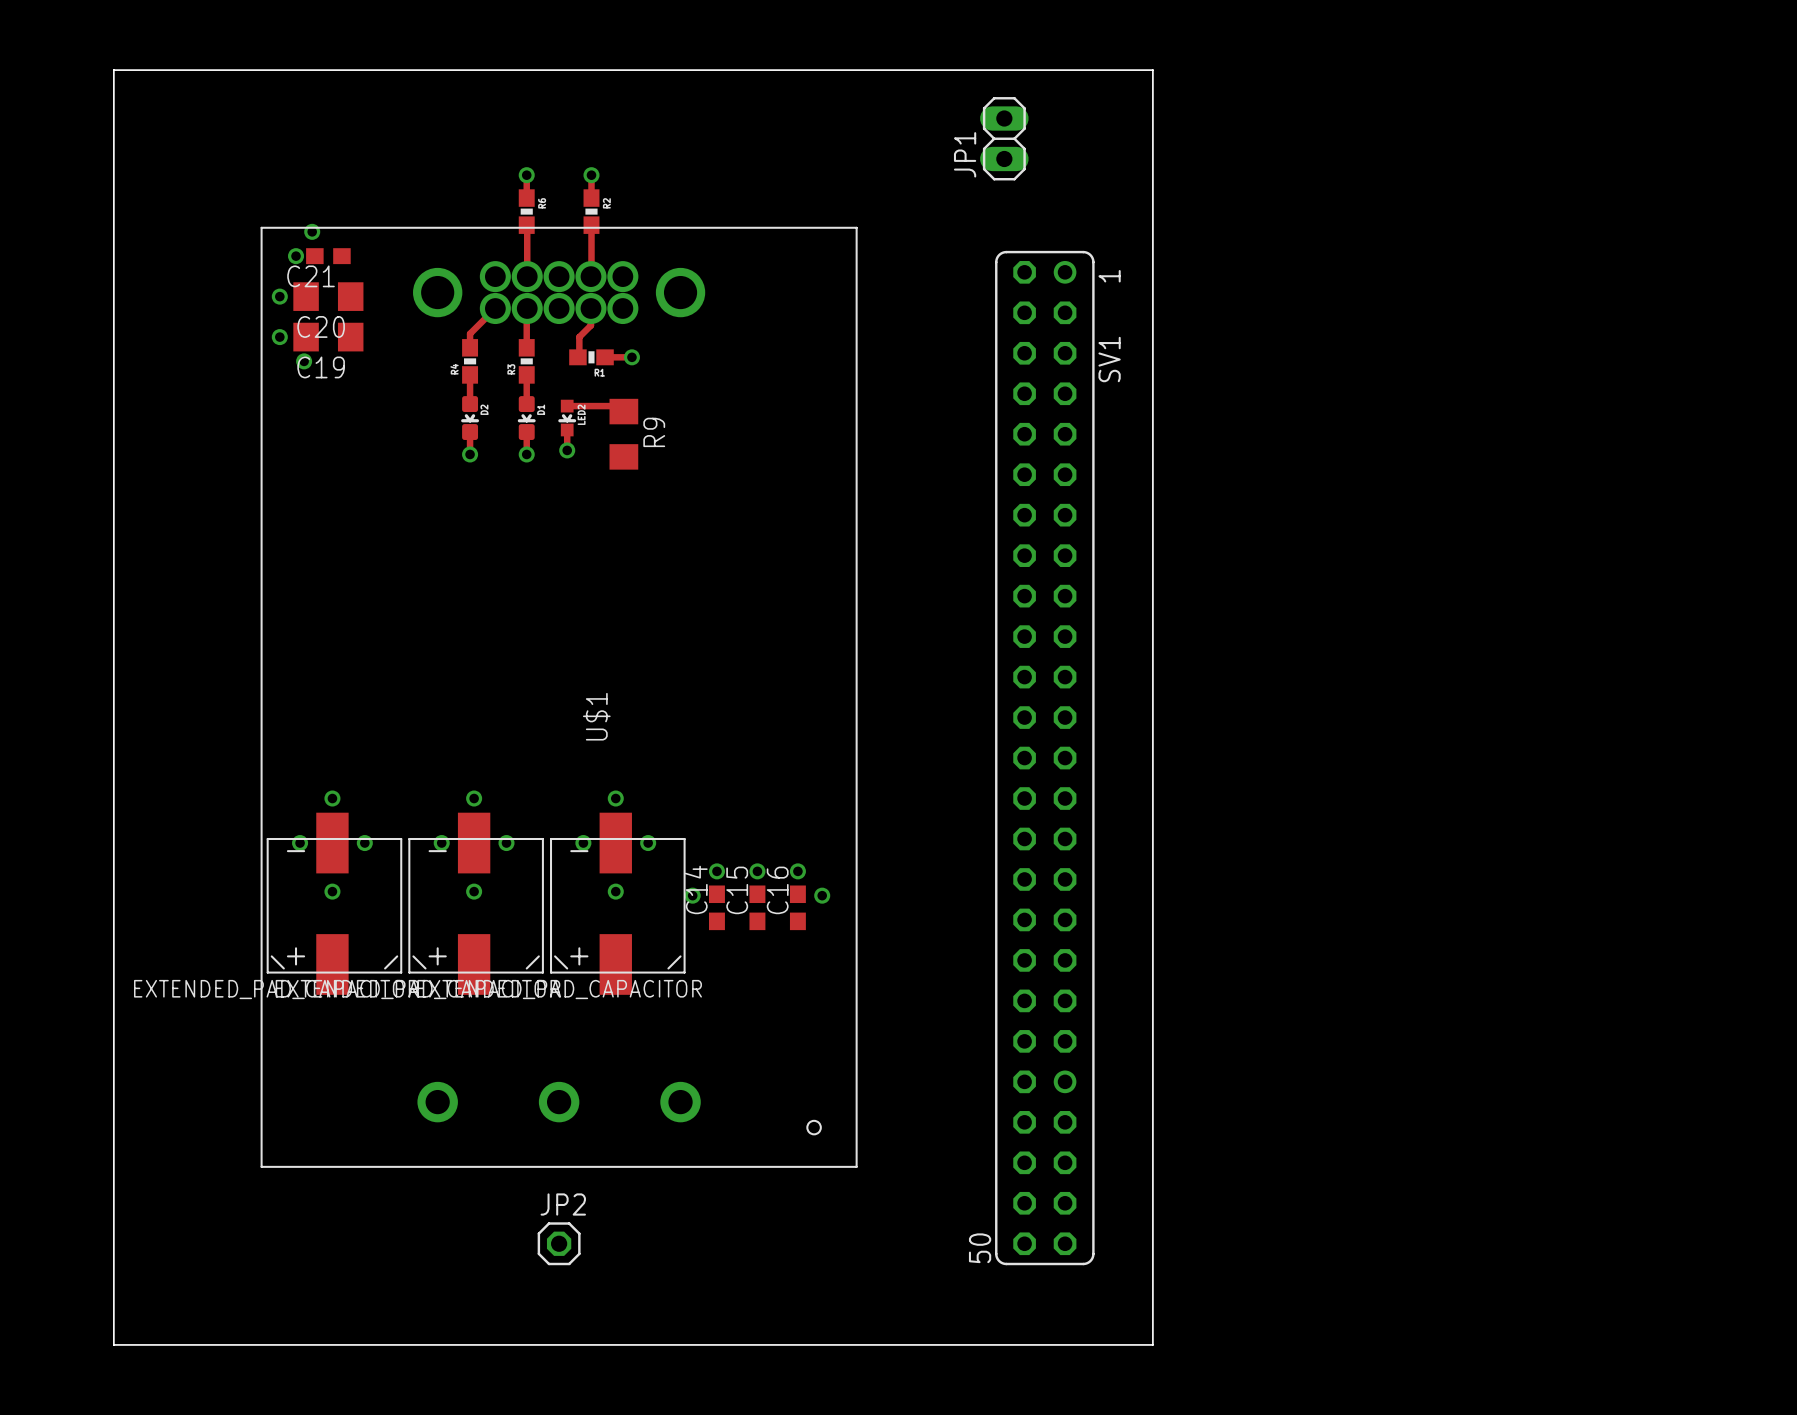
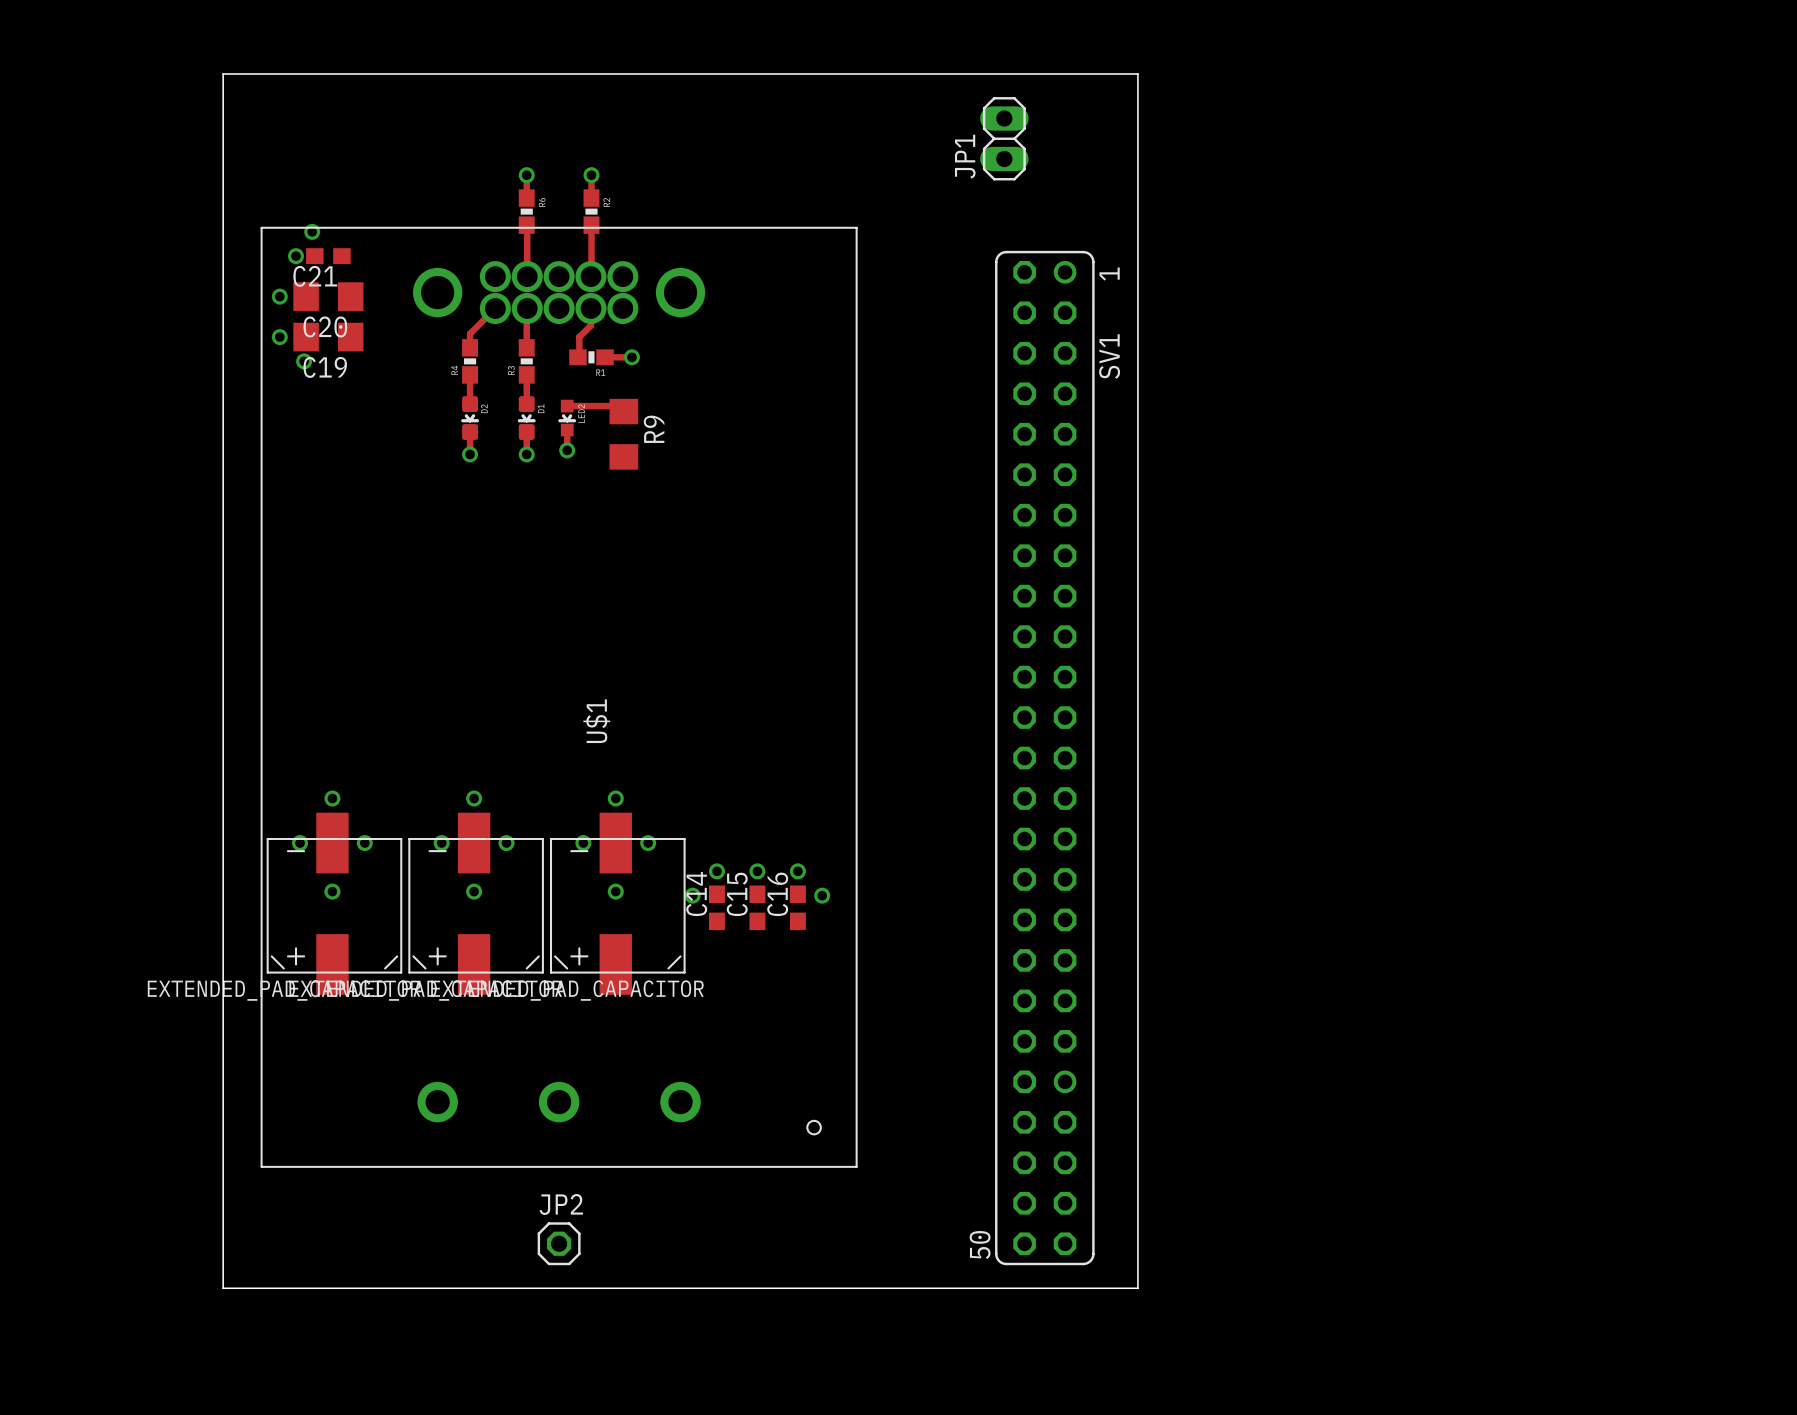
board edge: (113, 70) (1152, 70) (1152, 1344) (113, 1344) (113, 70) -> (223, 73) (223, 1288) (1137, 1288) (1137, 73) (223, 73)

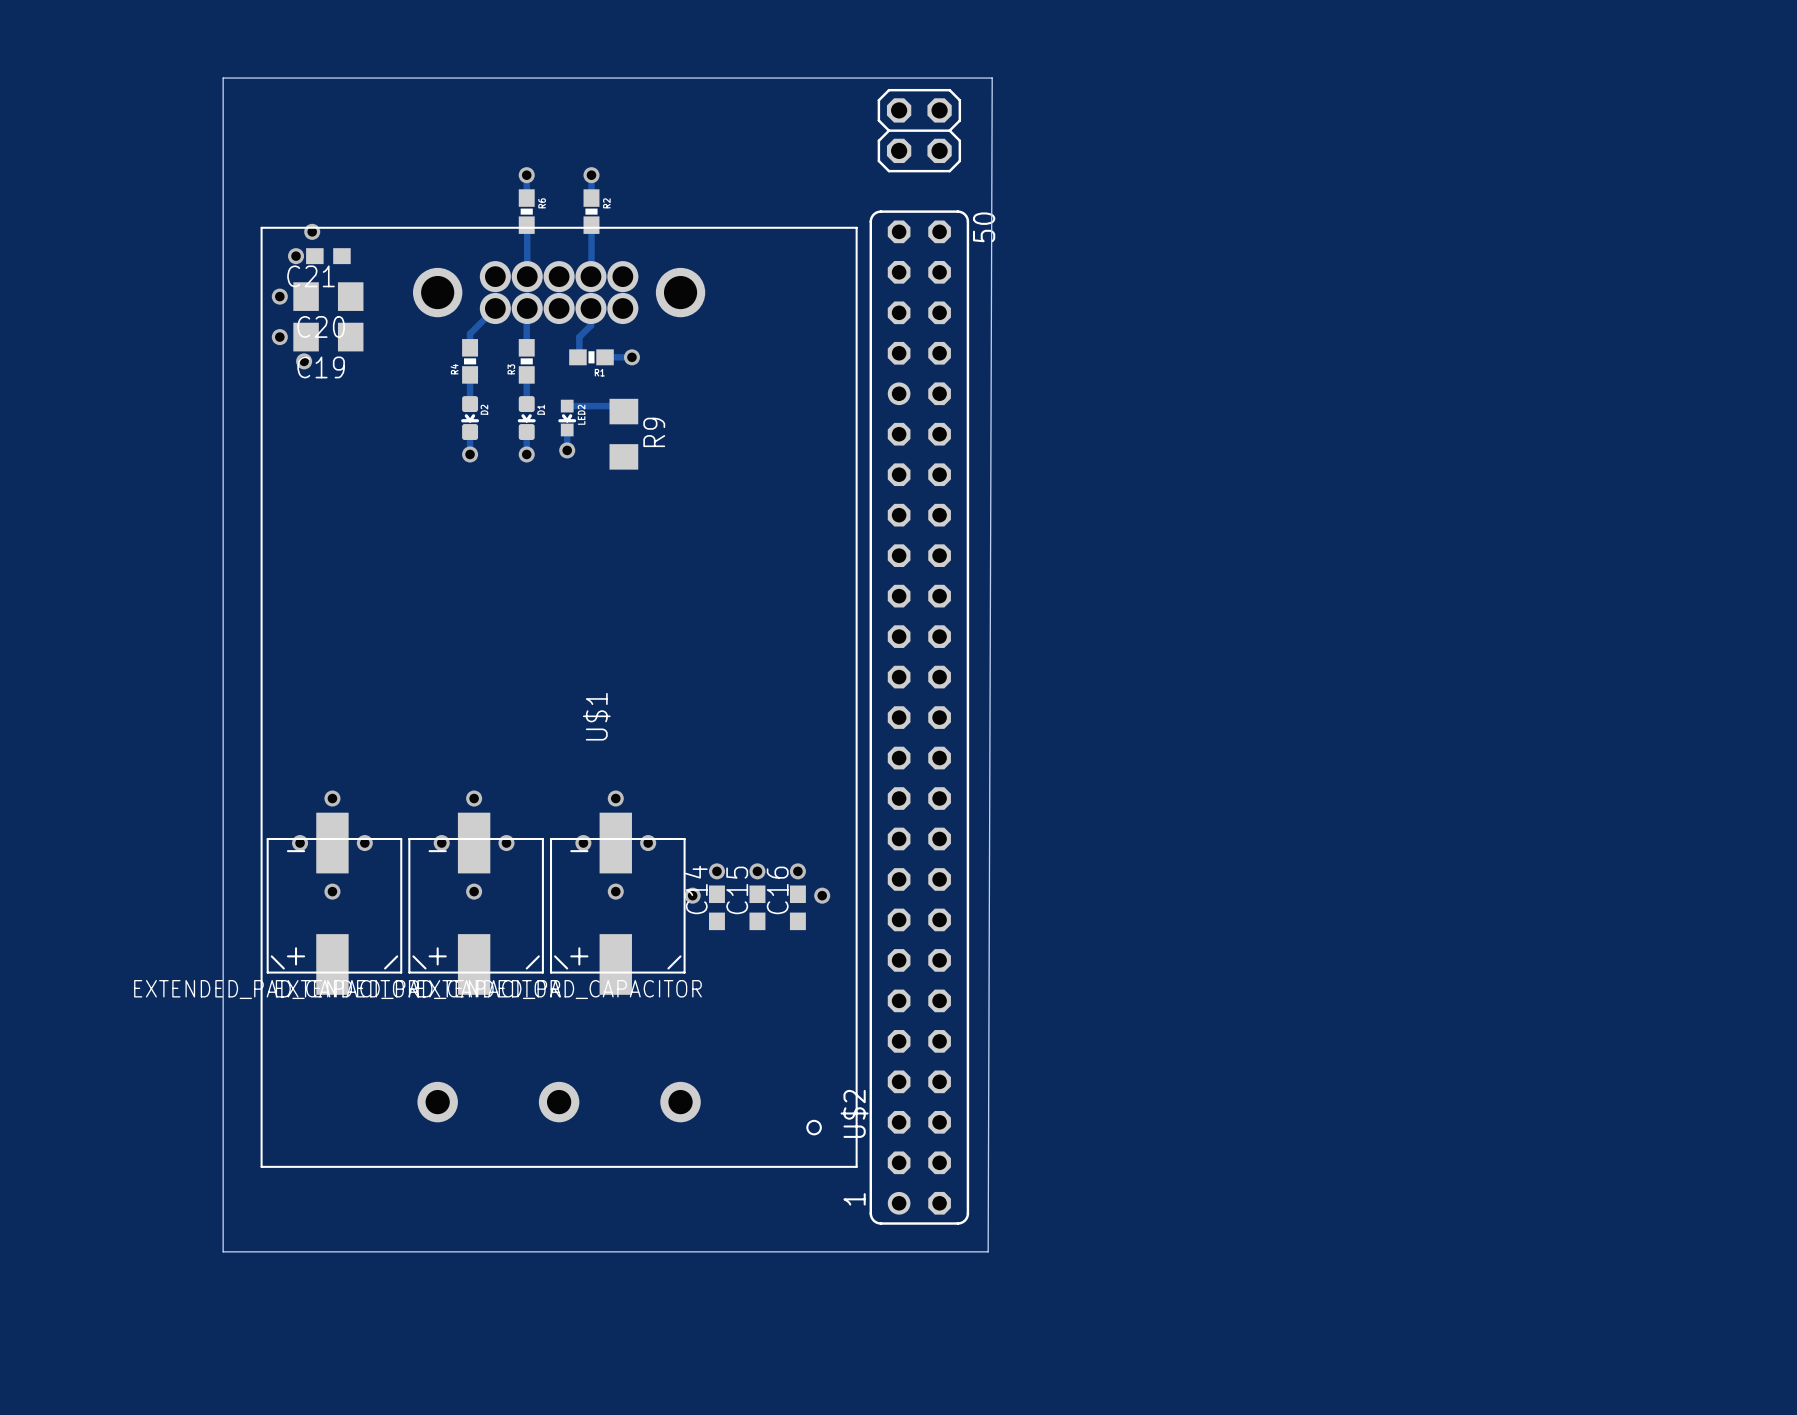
board edge: (223, 78) (223, 73) (1137, 73) (1137, 1288) (223, 1288) (223, 1251) -> (223, 78) (992, 78) (988, 1251) (223, 1251)
JP1: (1004, 138) -> none
U$2: none -> (919, 656)
SV1: (1044, 758) -> none
JP2: (559, 1243) -> none

